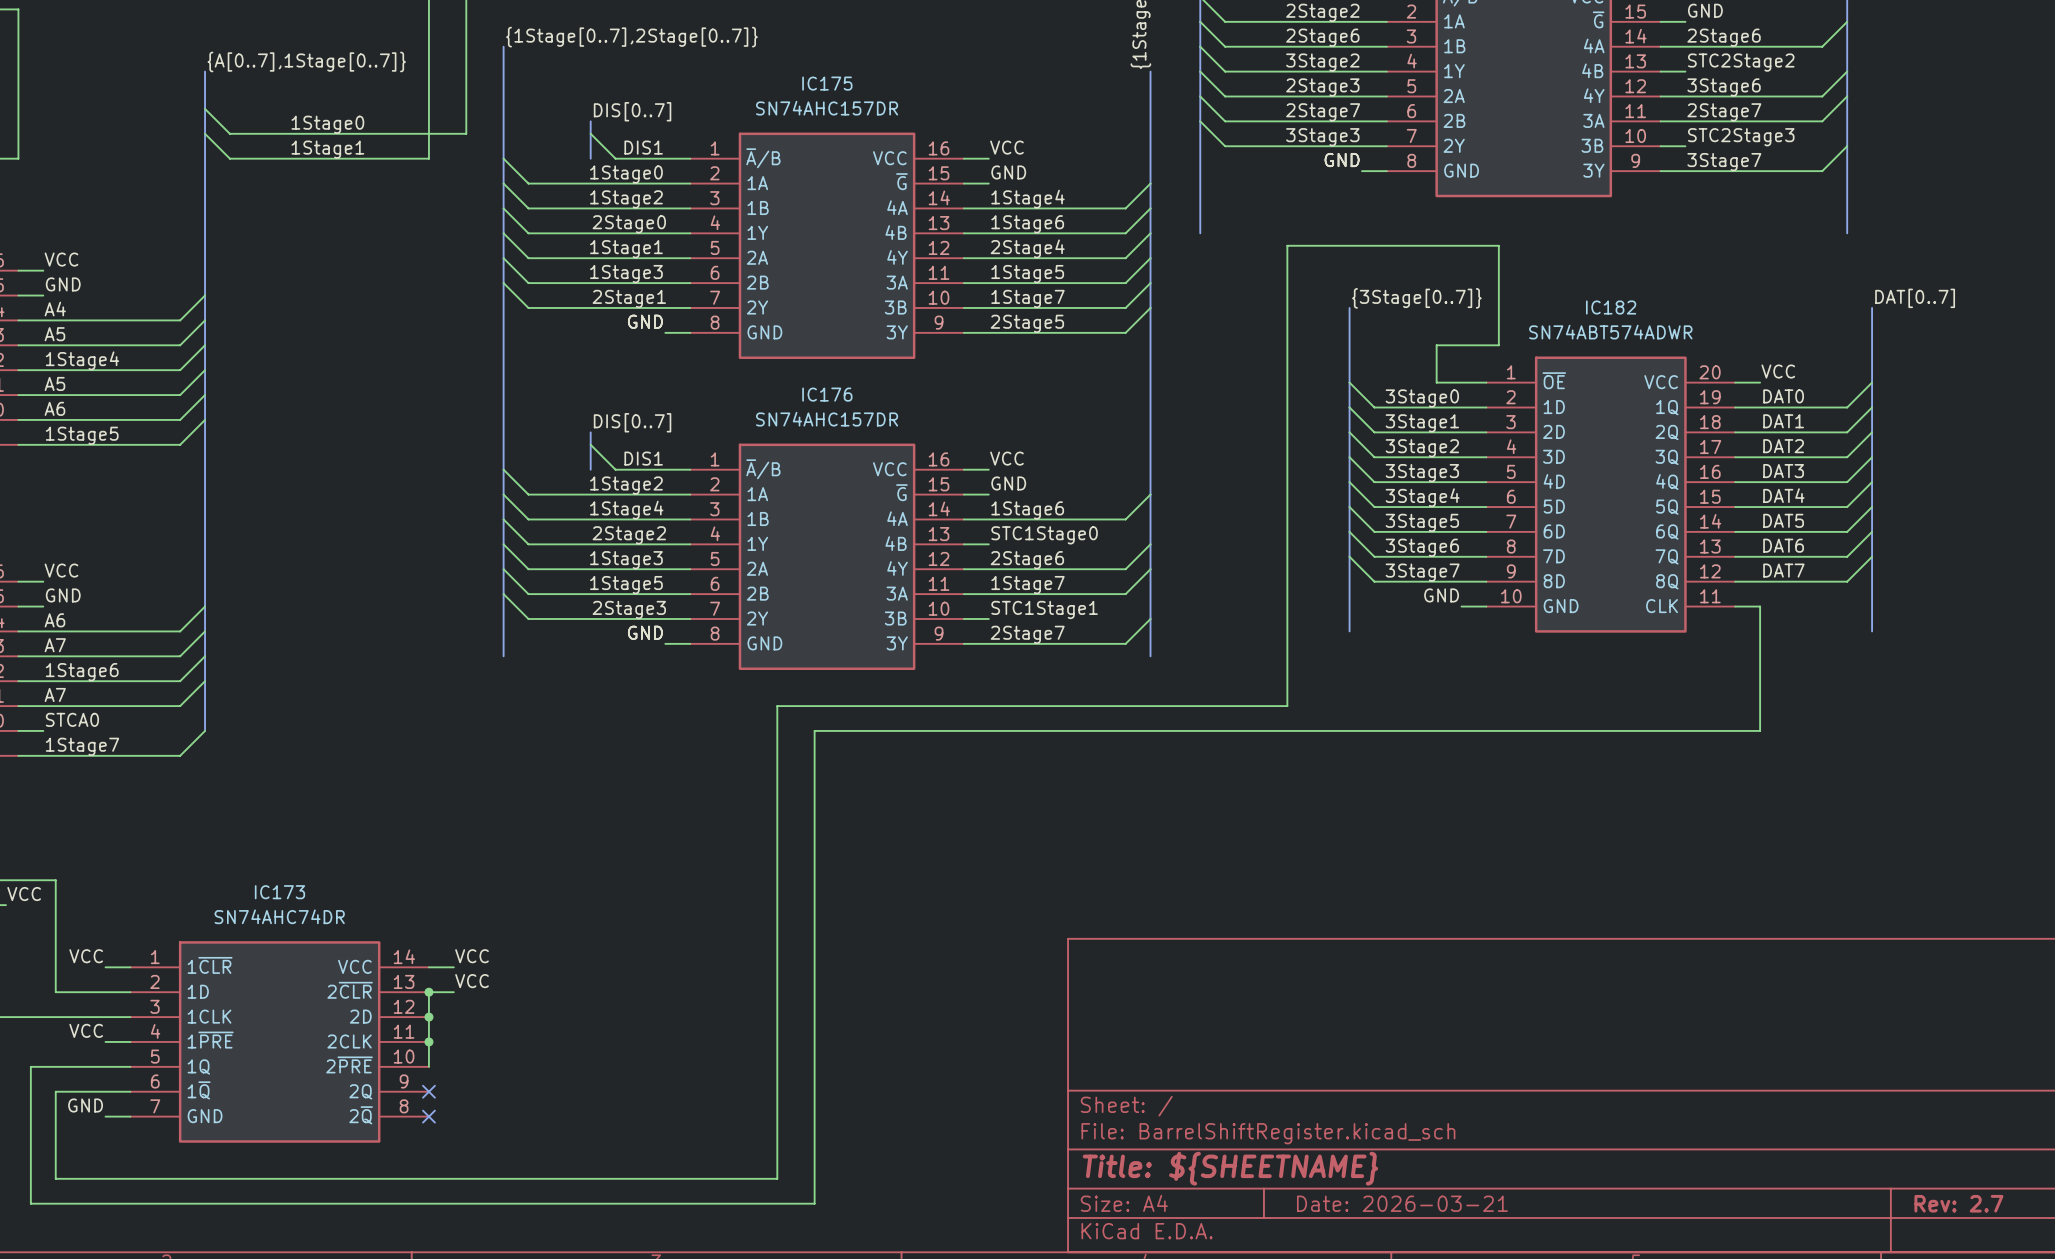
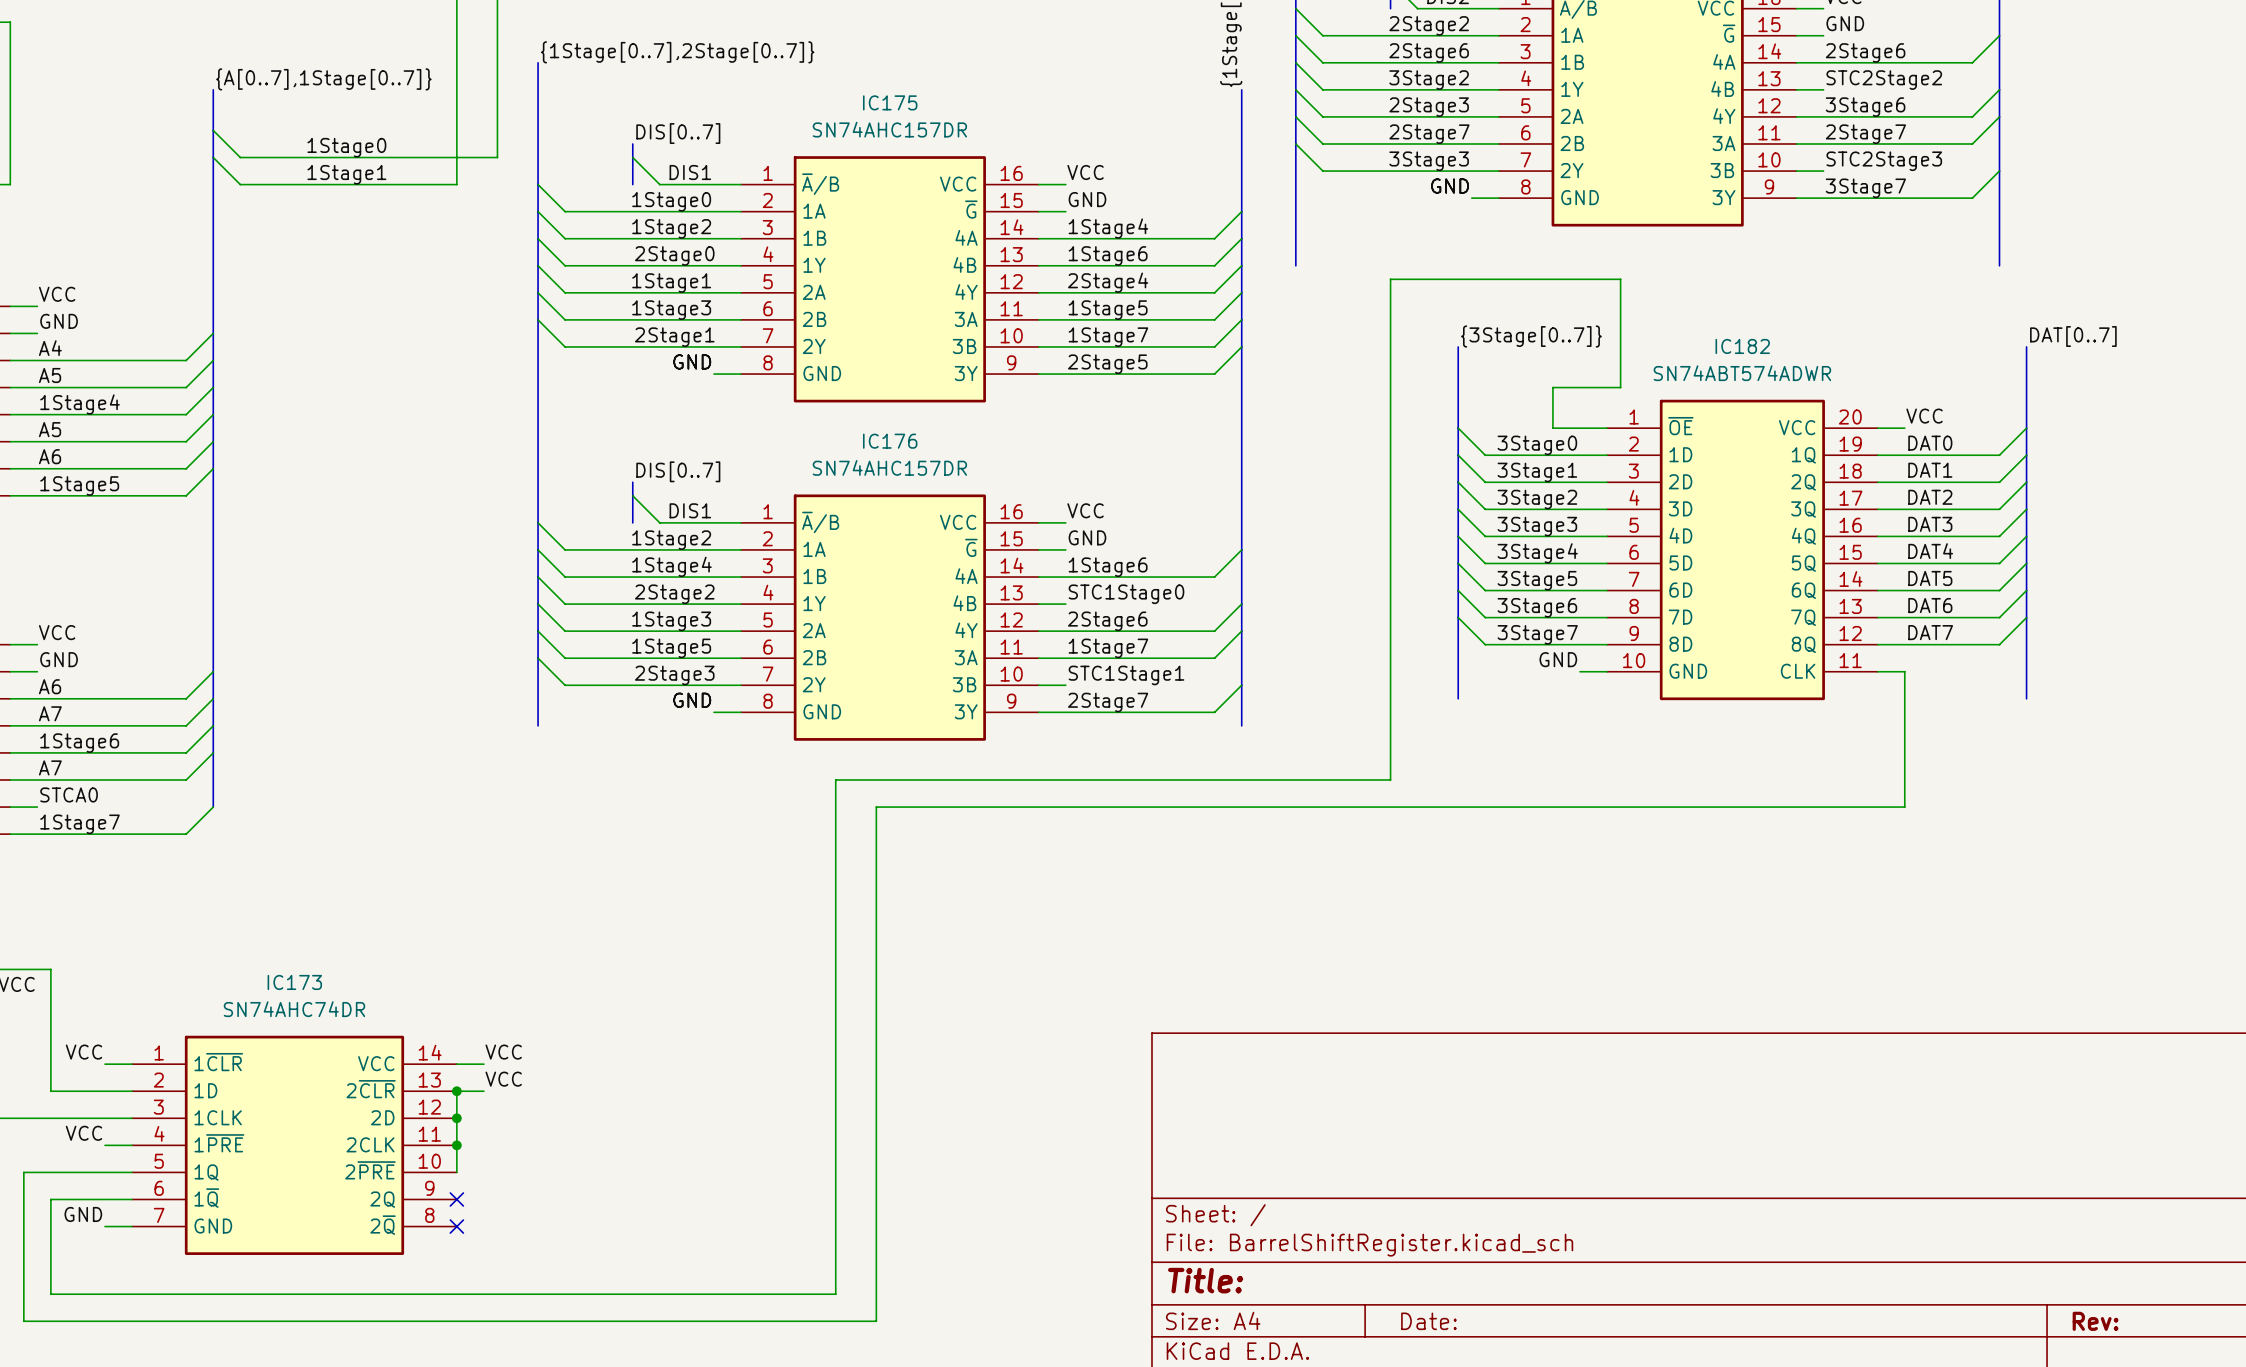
title block: Title: ${SHEETNAME} (1230, 1168) -> Title: (1205, 1280)
title block: Date: 2026-03-21 (1402, 1203) -> Date: (1428, 1321)
title block: Rev: 2.7 (1958, 1203) -> Rev: (2095, 1321)

